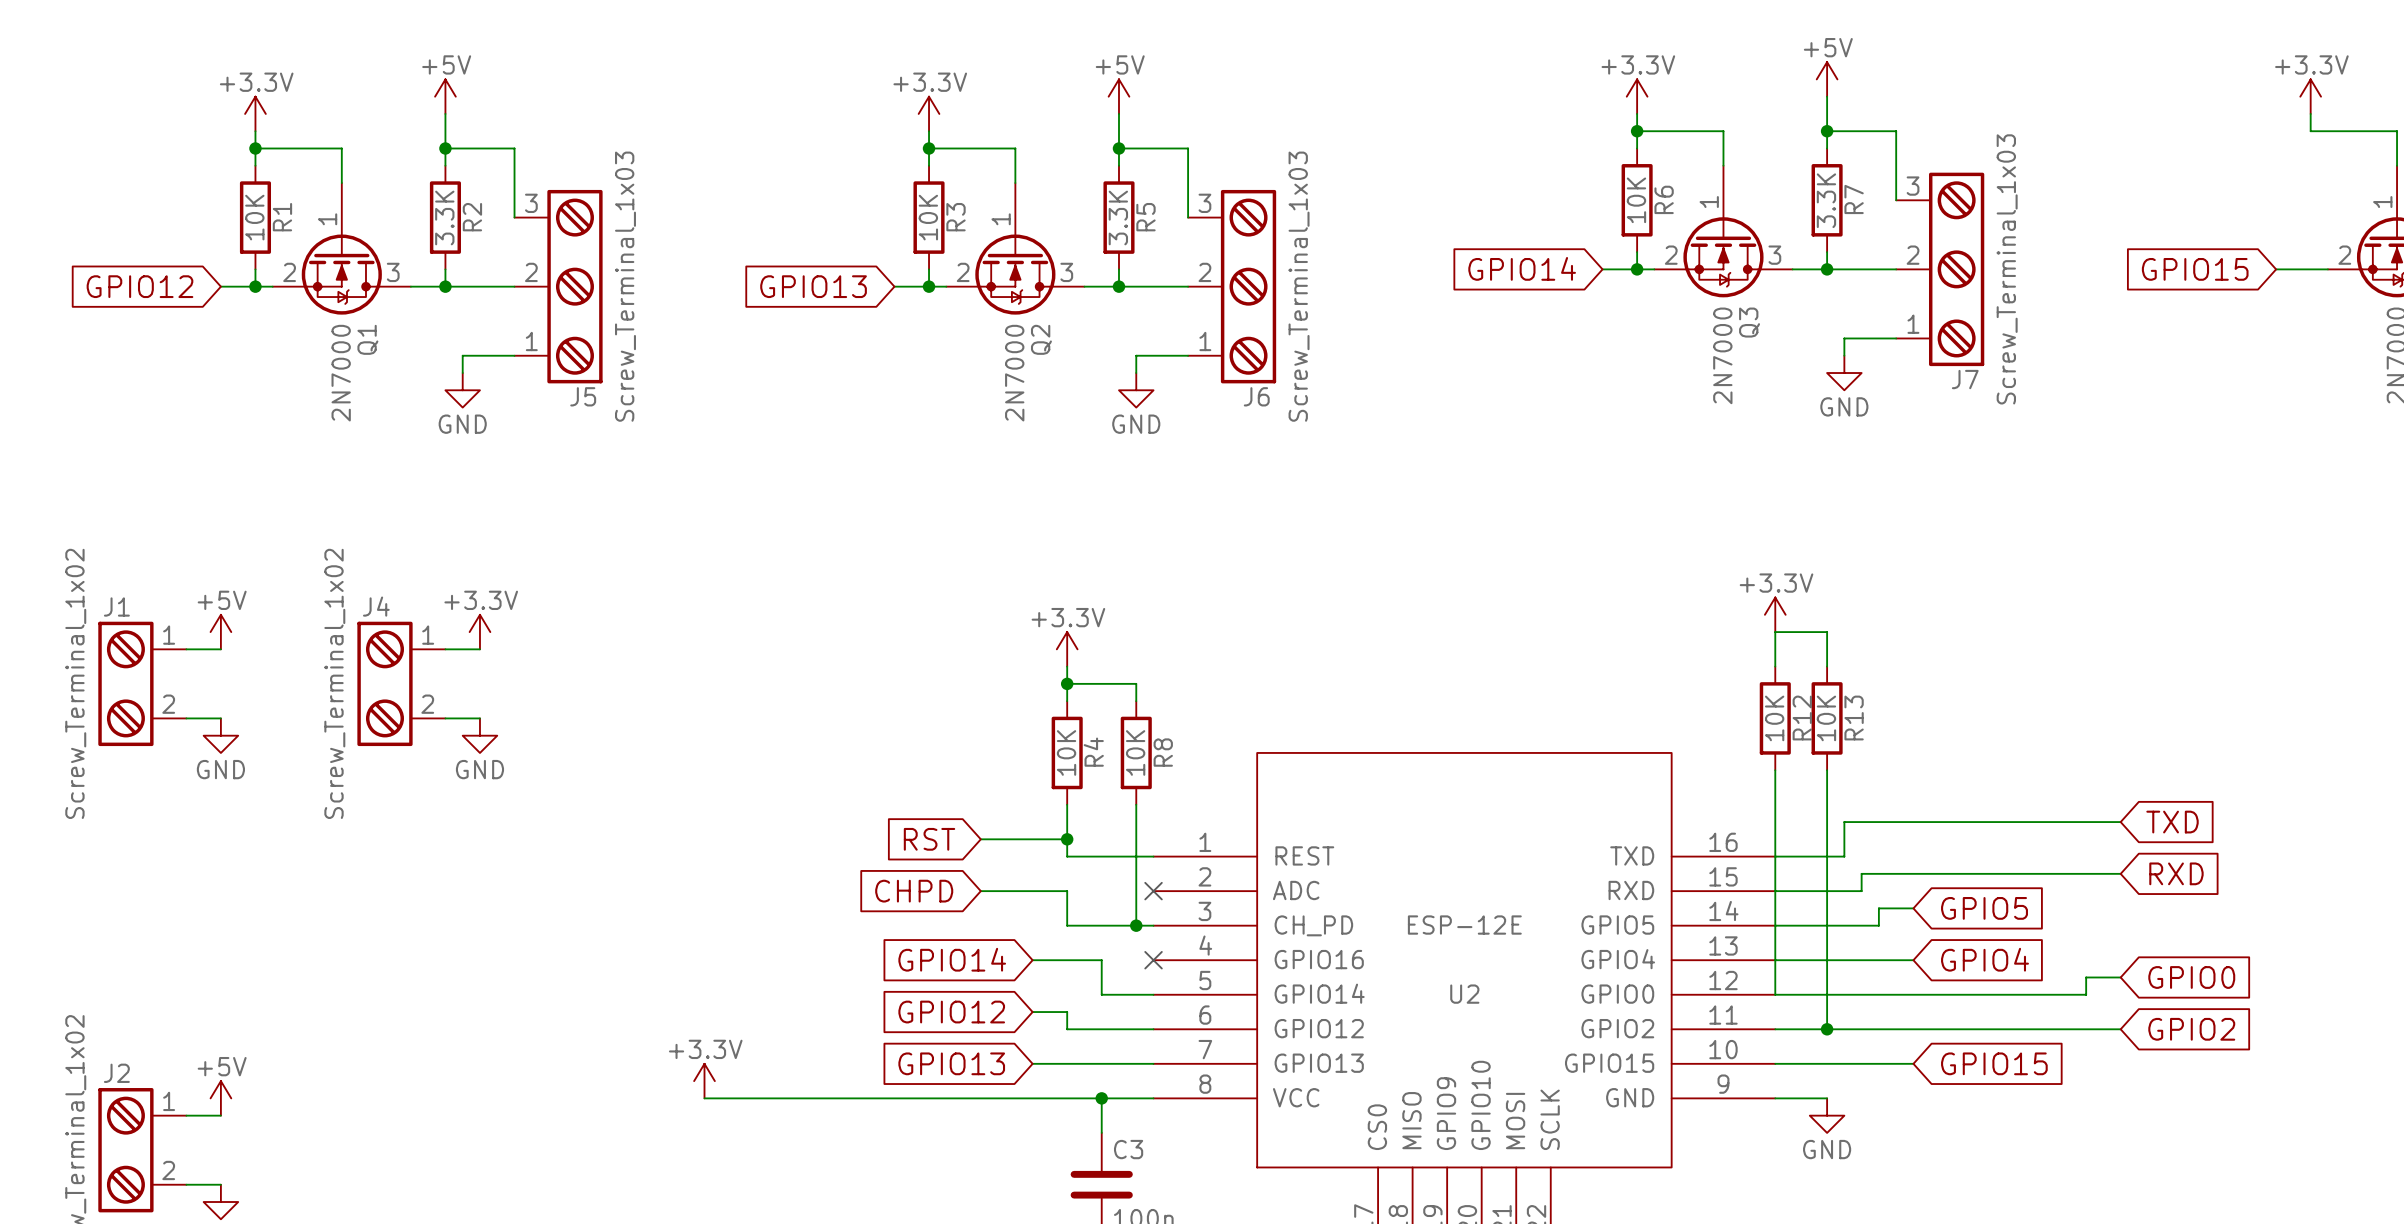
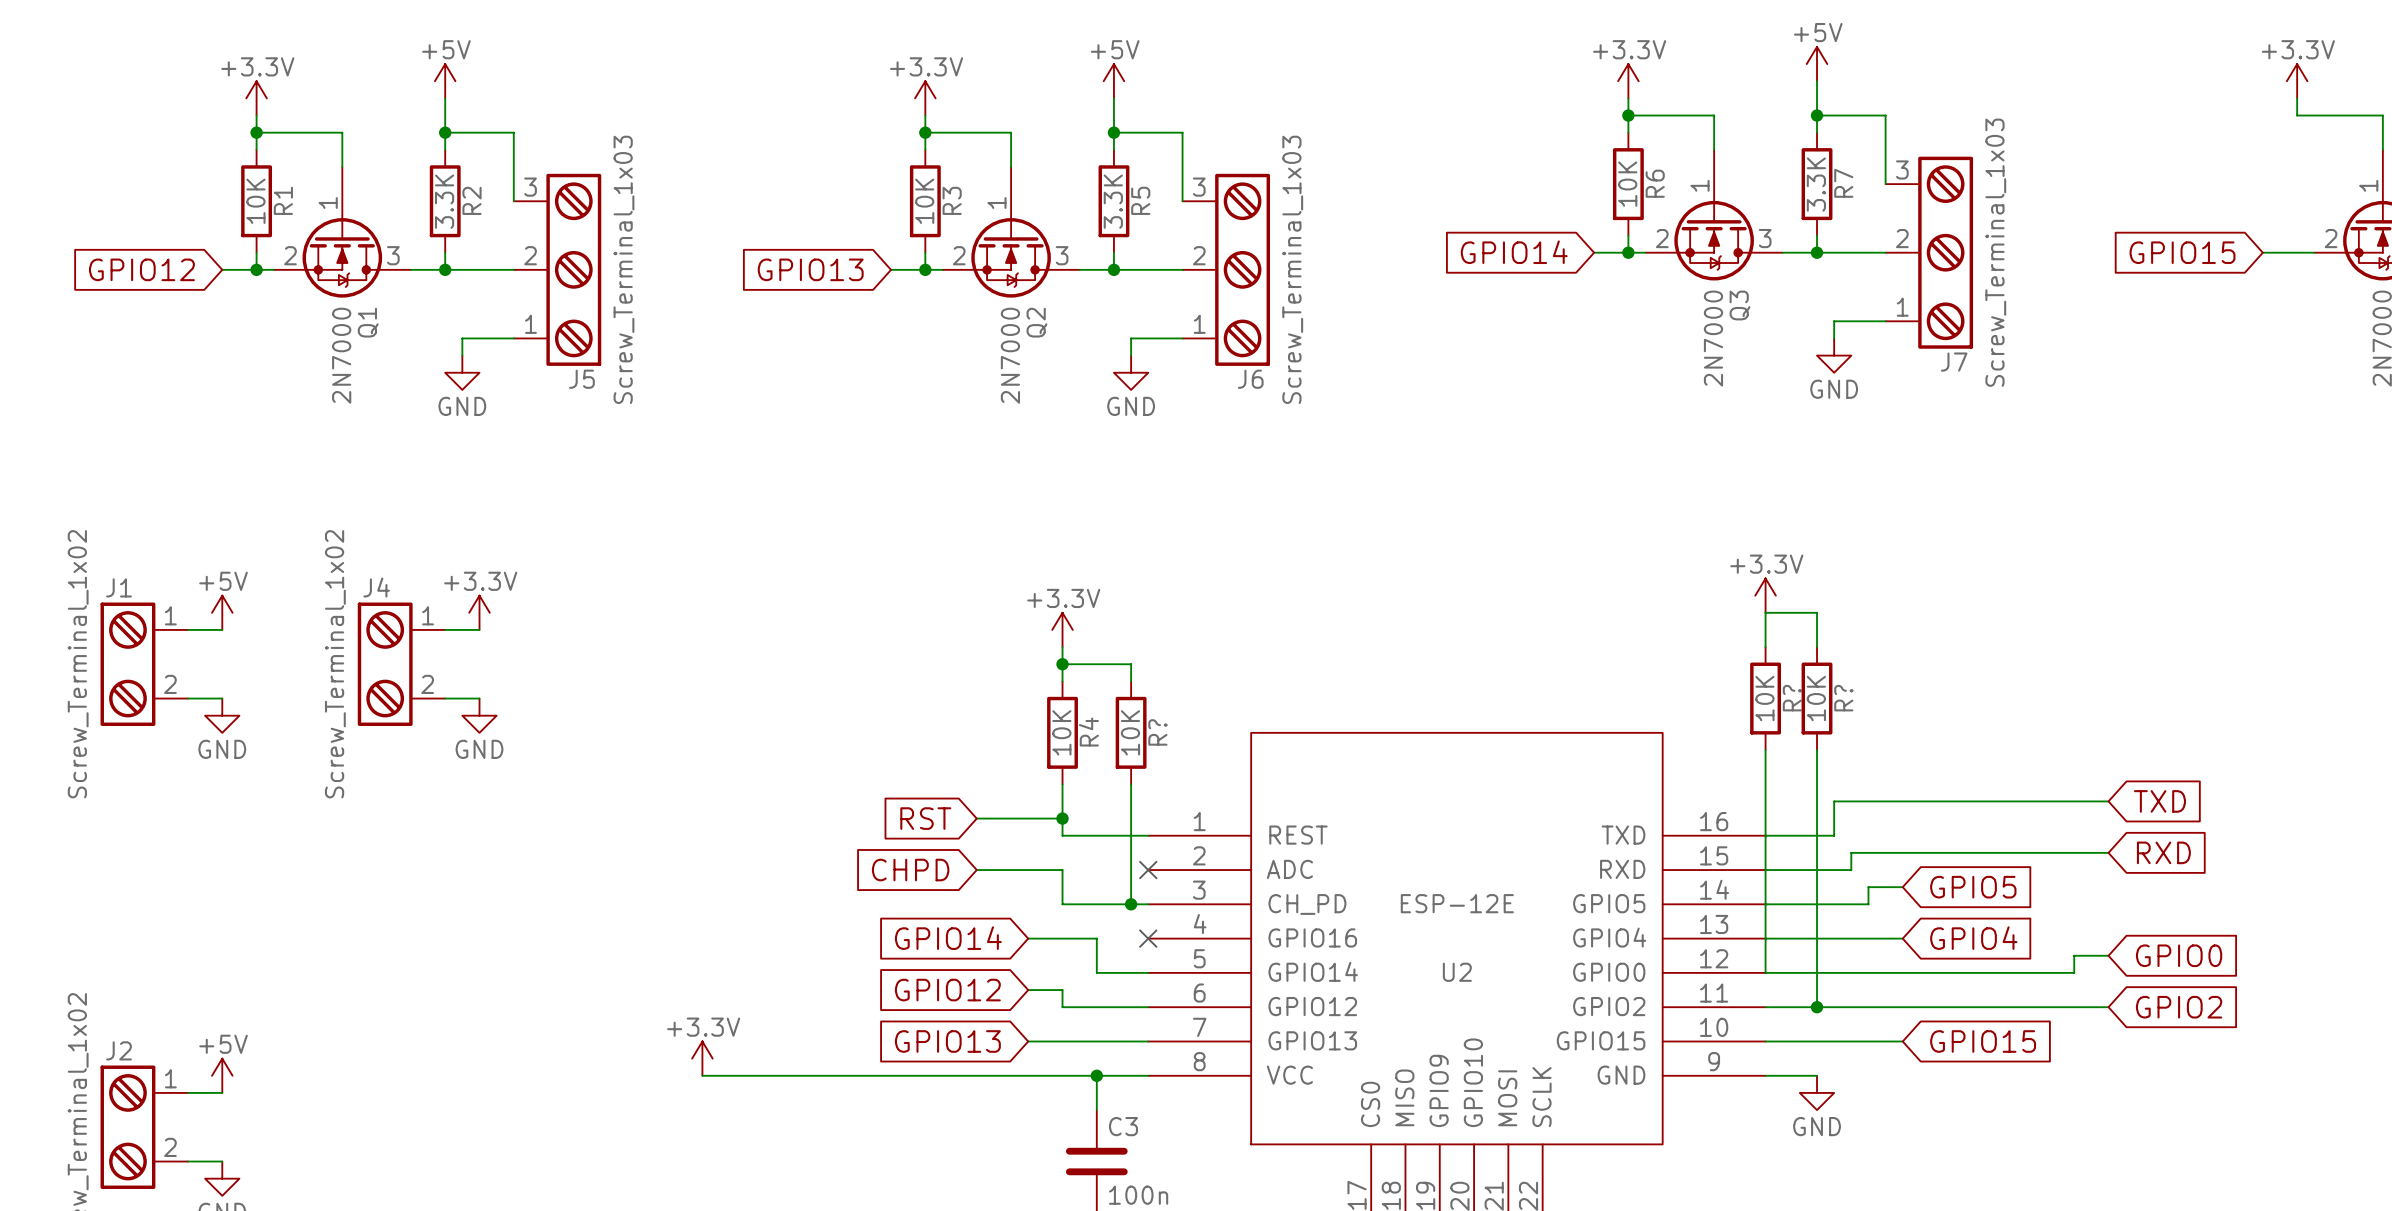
R12 name: R12 (1802, 718) -> R? (1792, 698)
R13 name: R13 (1854, 718) -> R? (1843, 698)
R8 name: R8 (1163, 752) -> R? (1157, 732)

